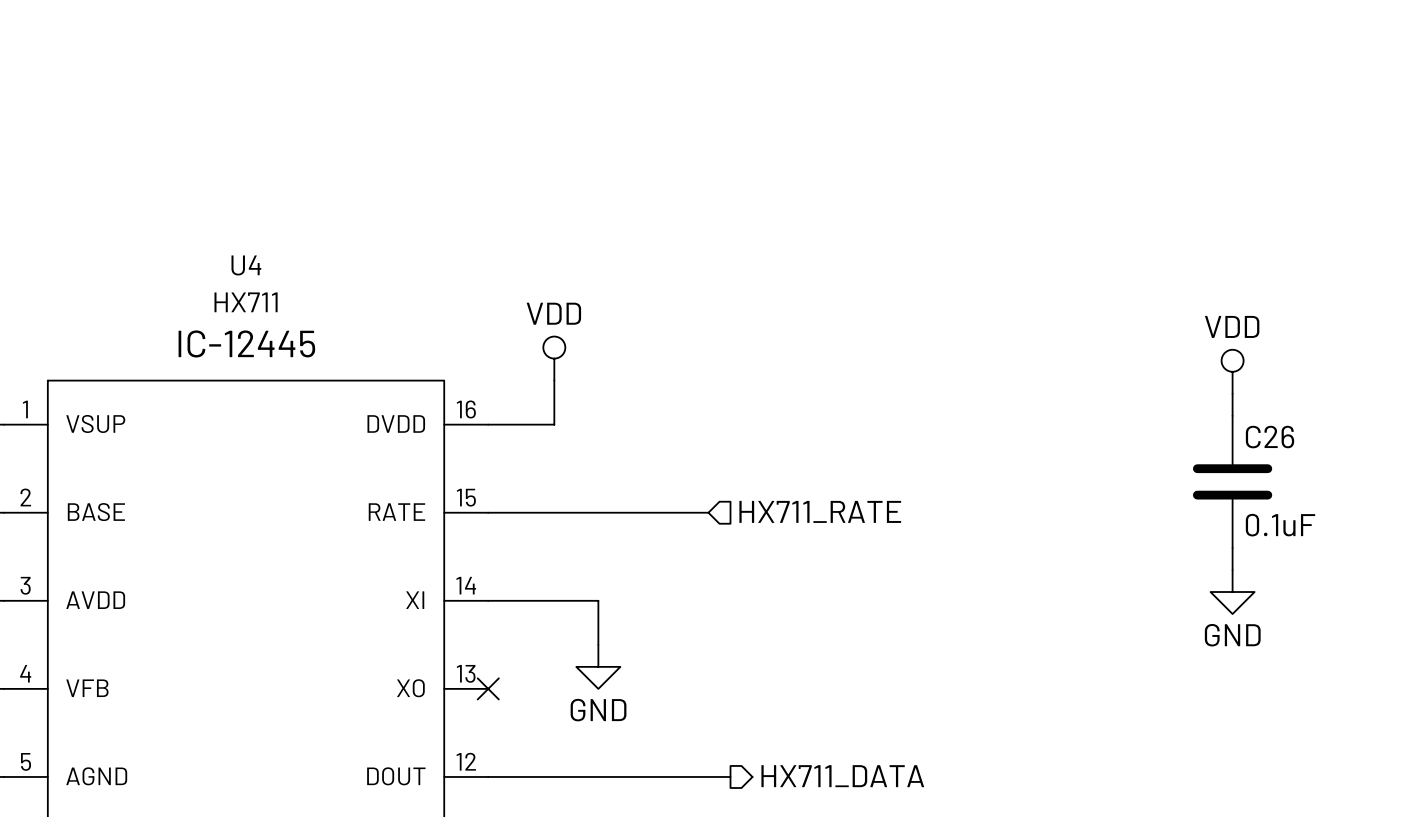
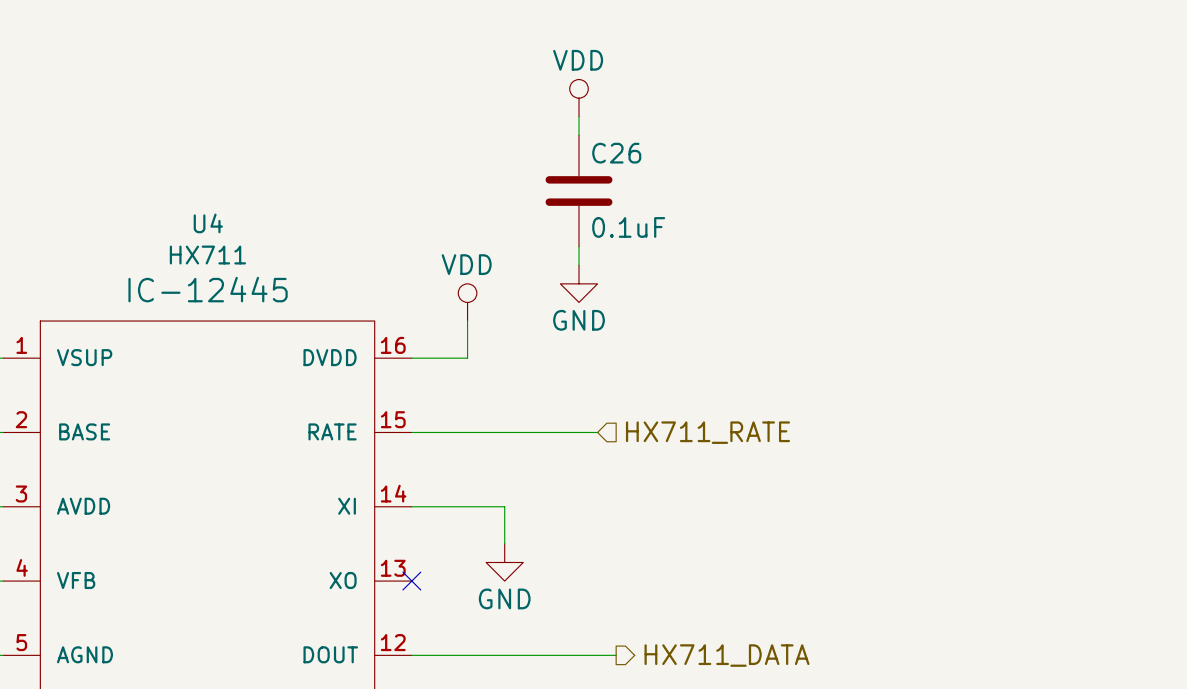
power symbol: none -> VDD (579, 98)
wire: none -> (579, 116) (579, 135)
wire: none -> (579, 246) (579, 265)
power symbol: none -> GND (579, 283)
power symbol: VDD (1232, 371) -> none
wire: (1232, 393) (1232, 415) -> none
C26 position: (1232, 481) -> (579, 191)
wire: (1232, 547) (1232, 569) -> none
power symbol: GND (1232, 592) -> none

